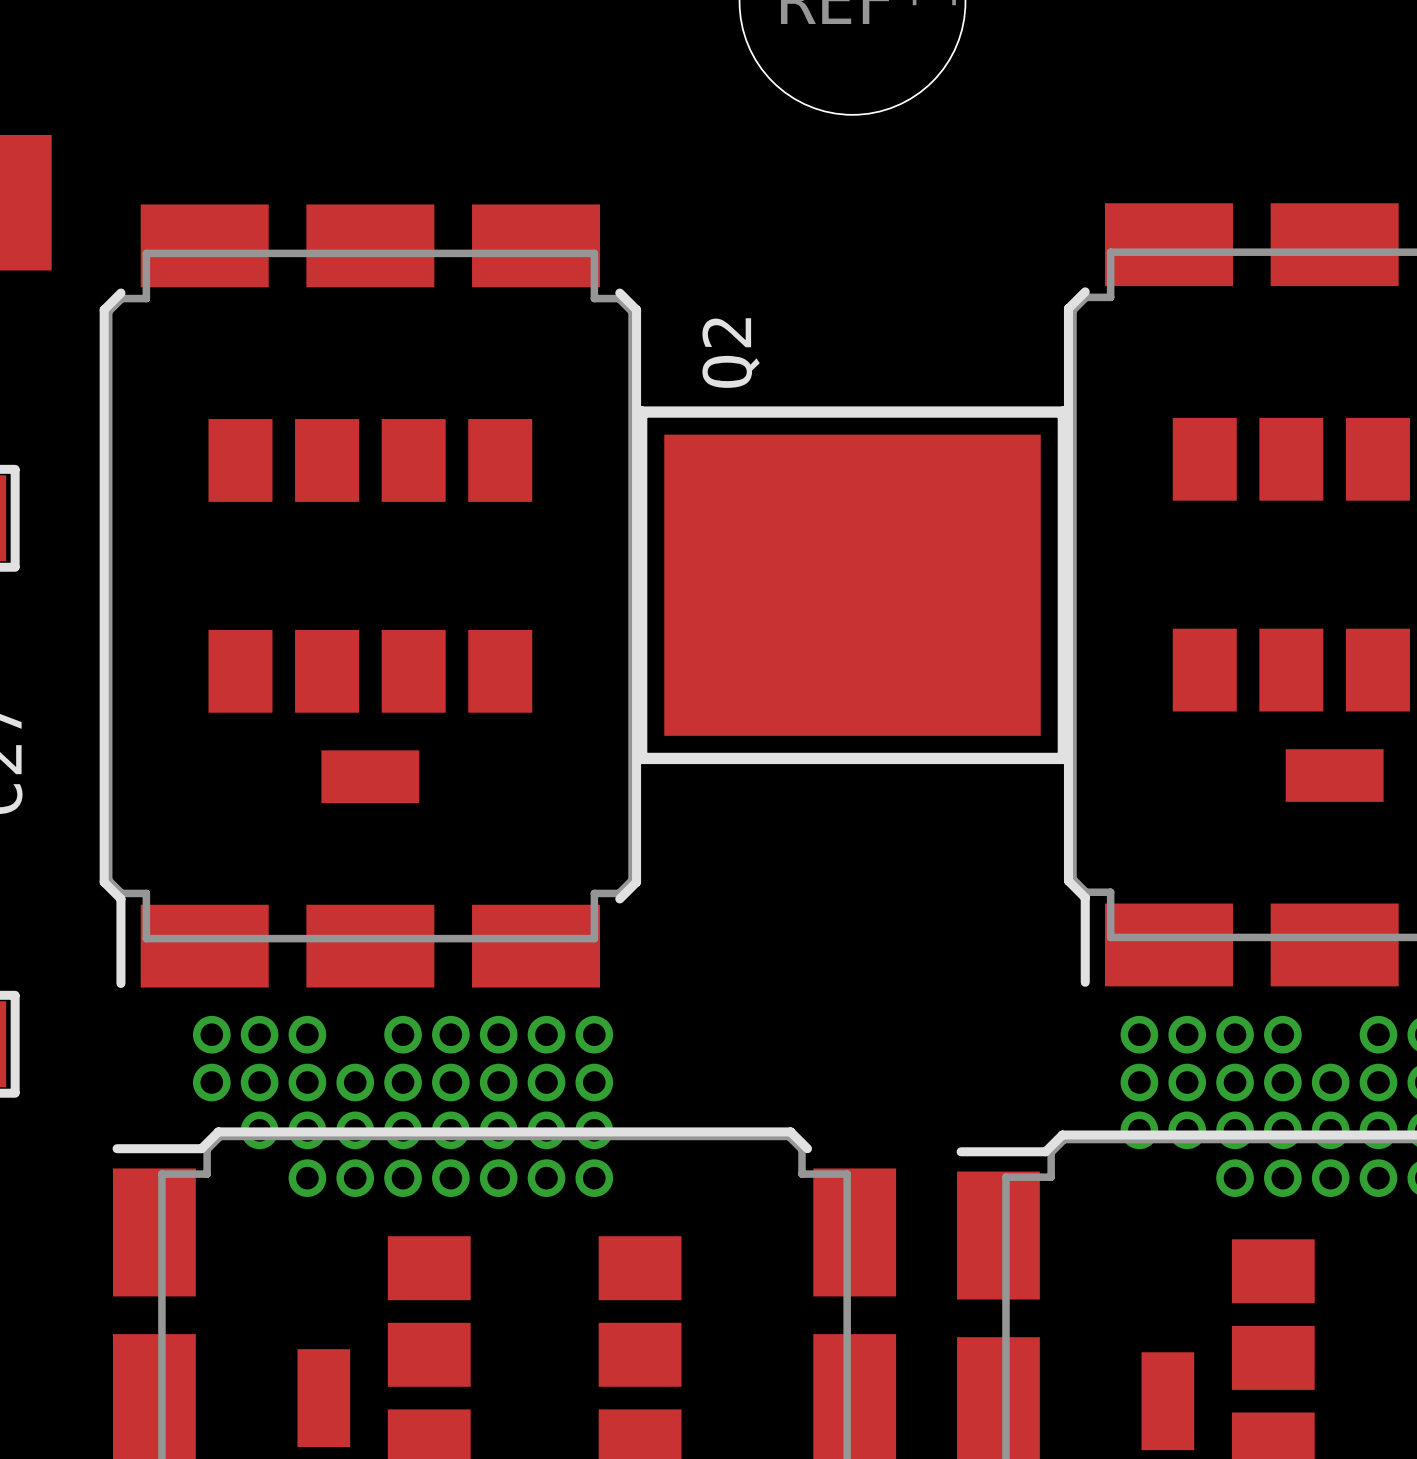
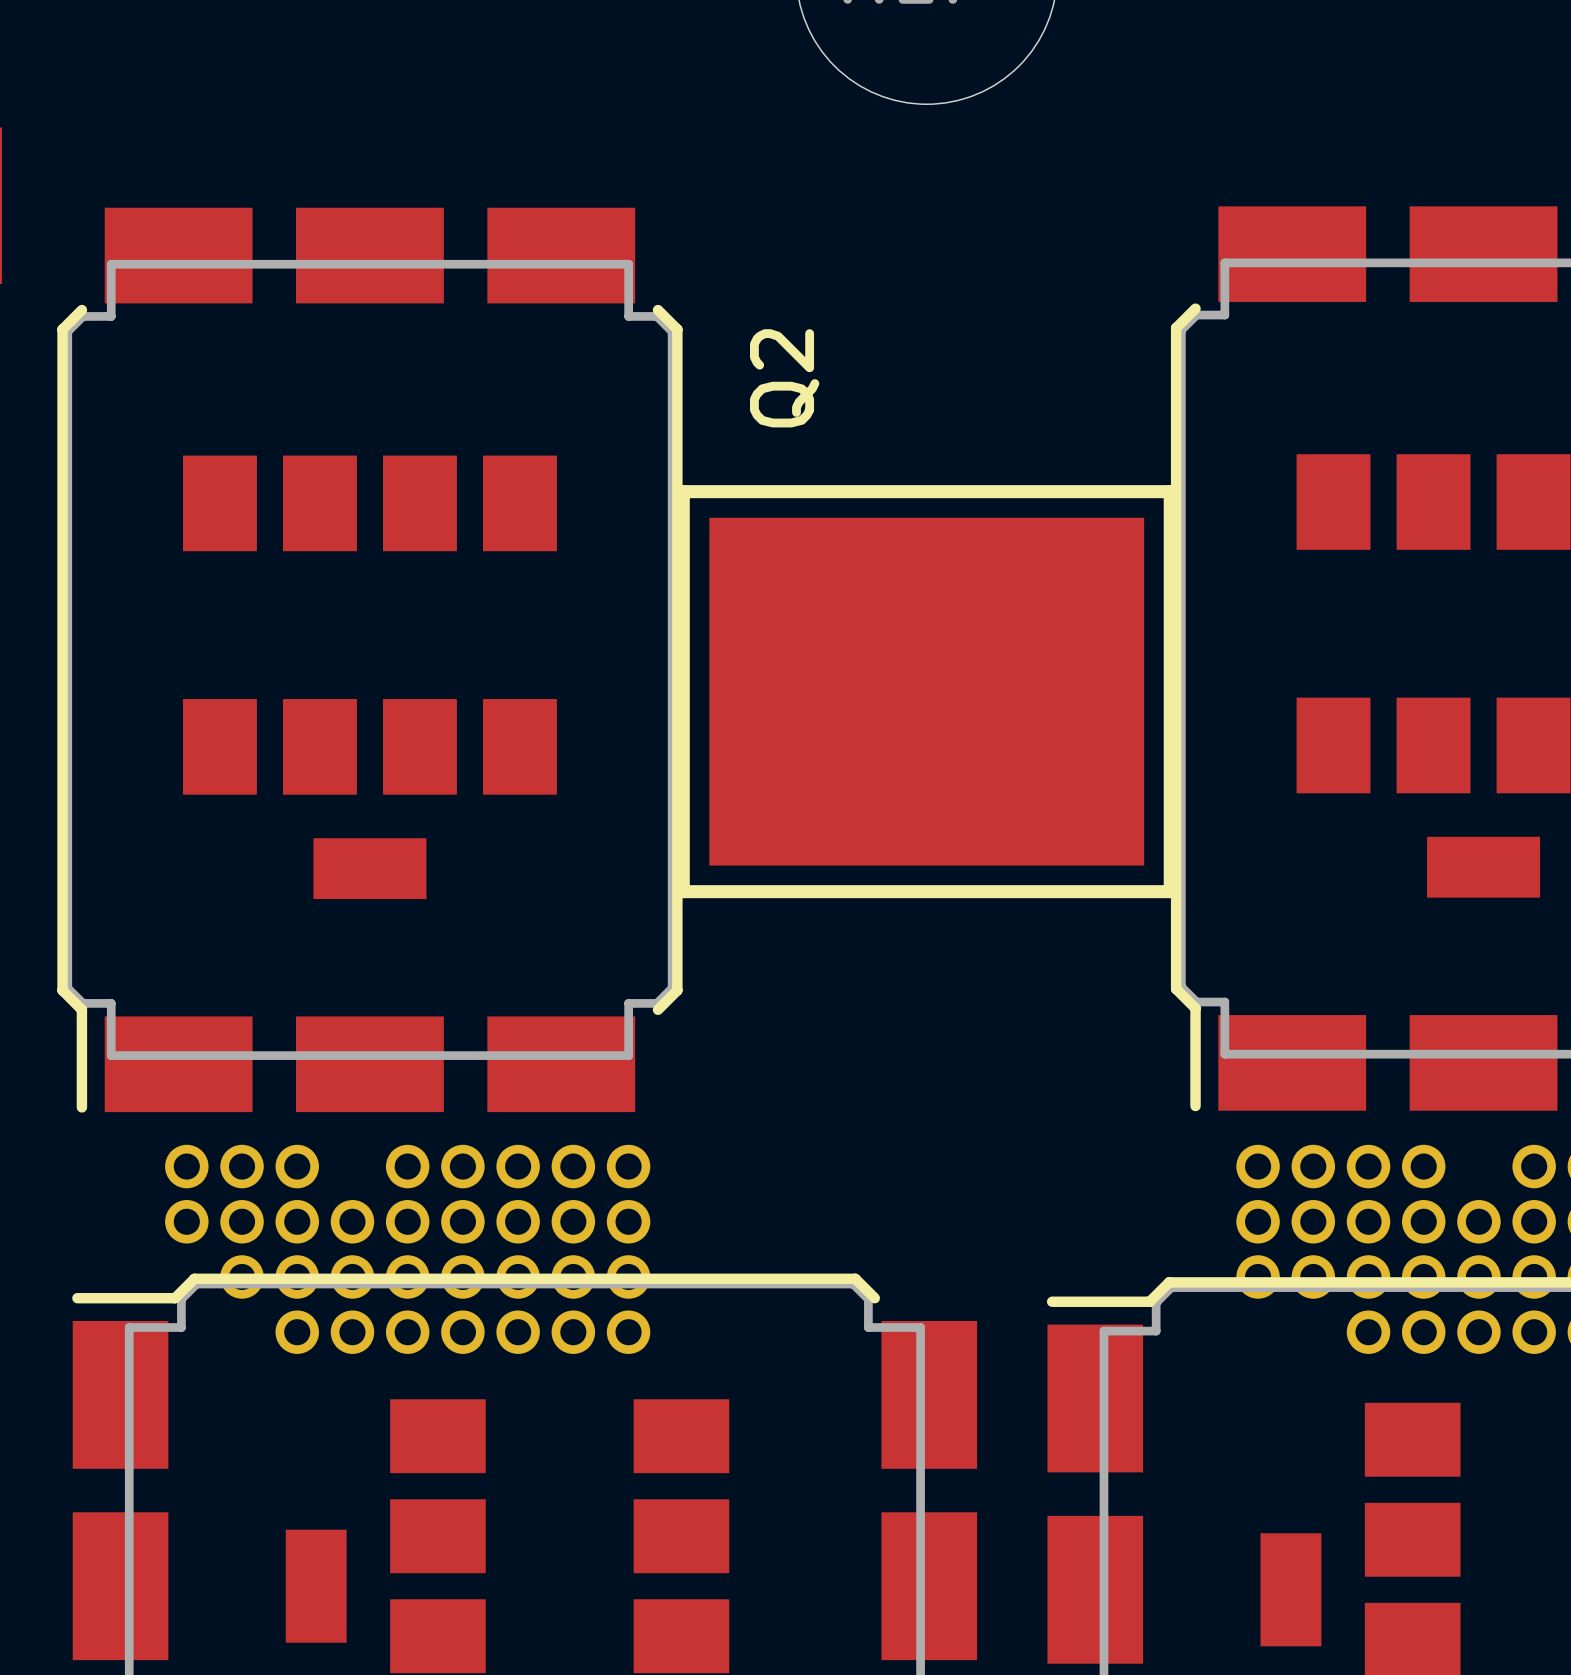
part position: (852, 585) -> (926, 691)

